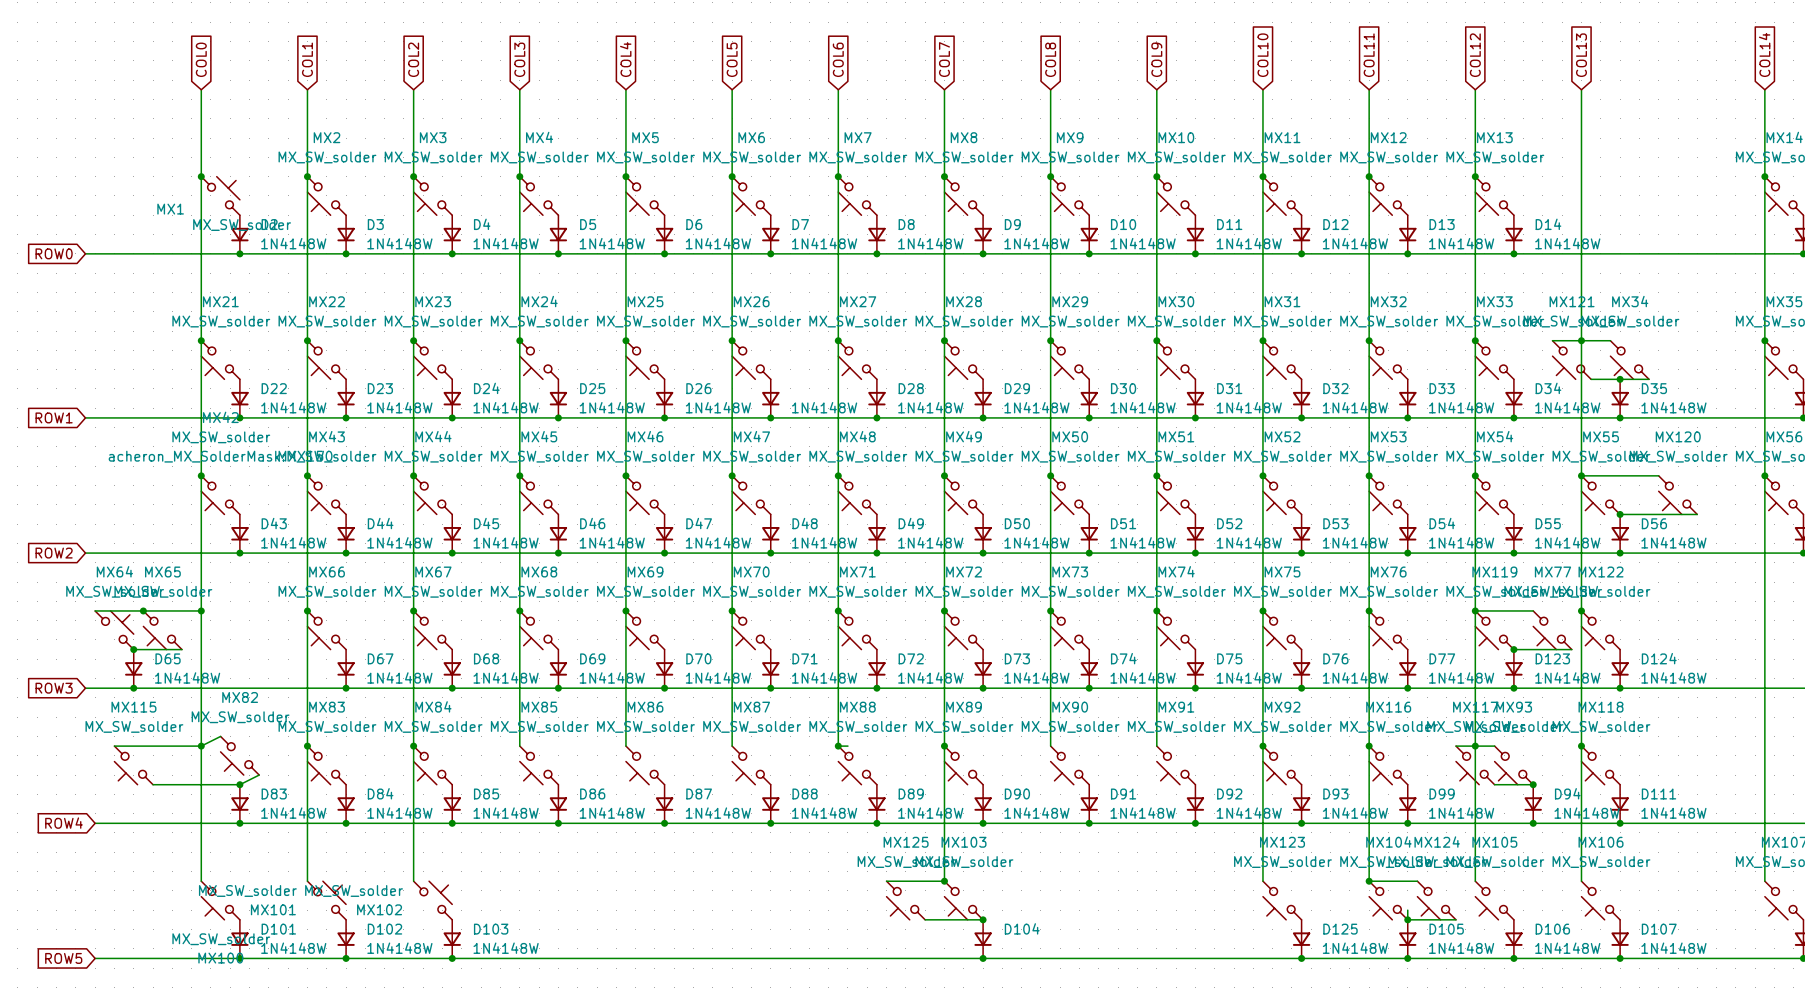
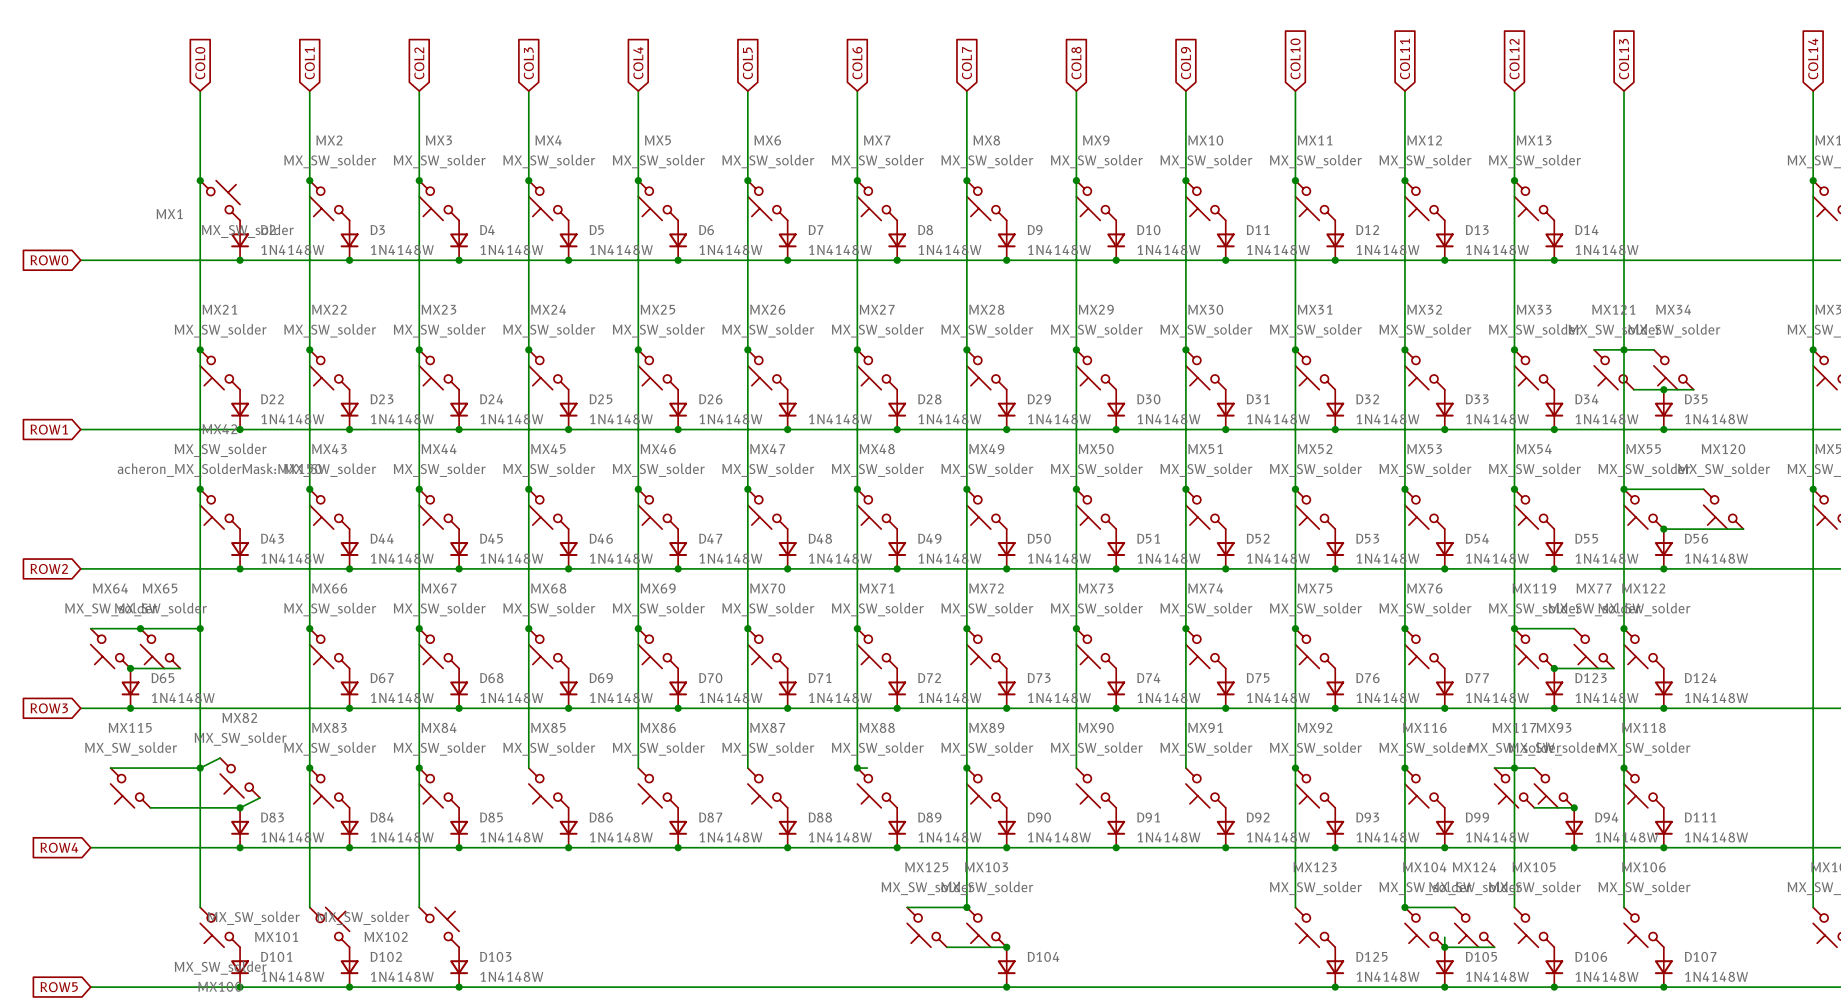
MX64 rotation: 0° (114, 630) -> 180° (110, 648)

